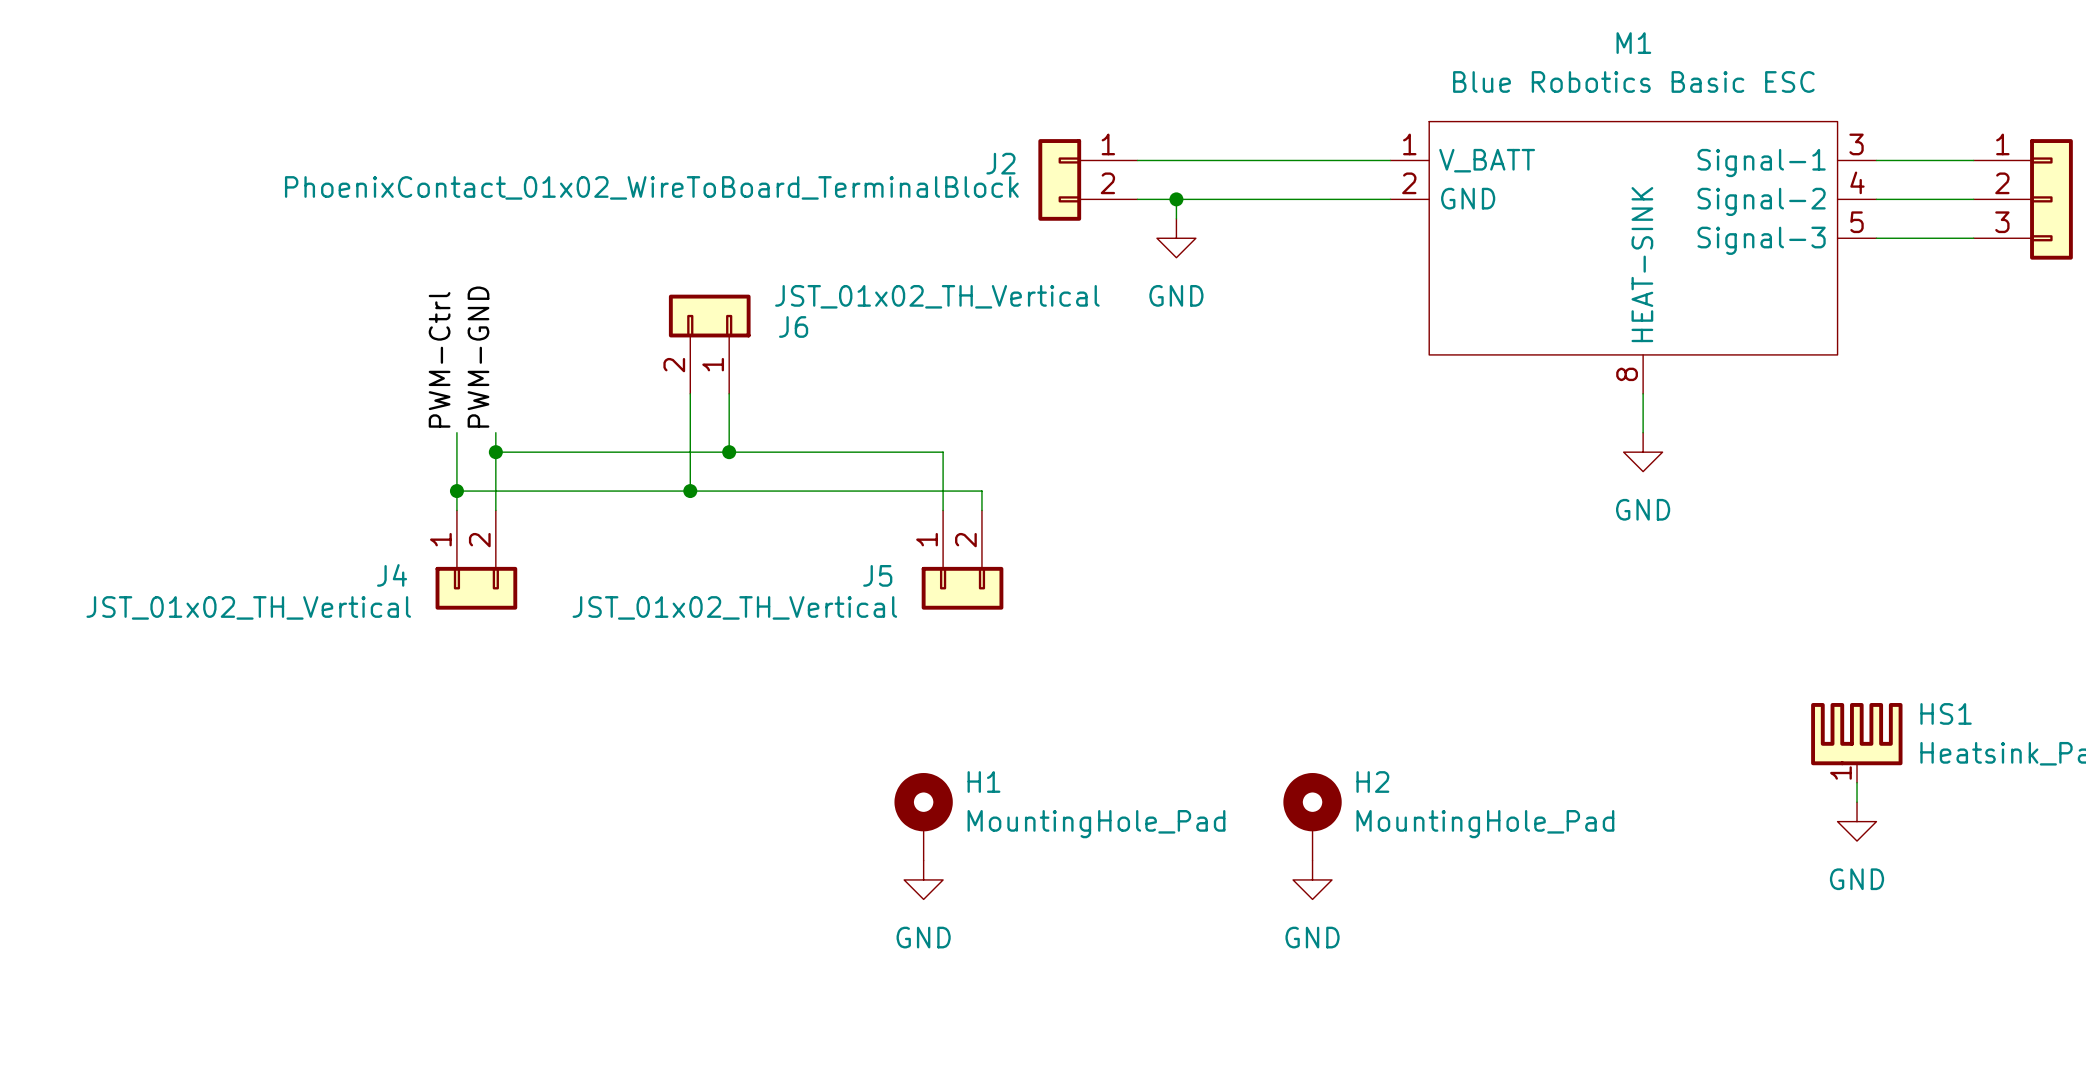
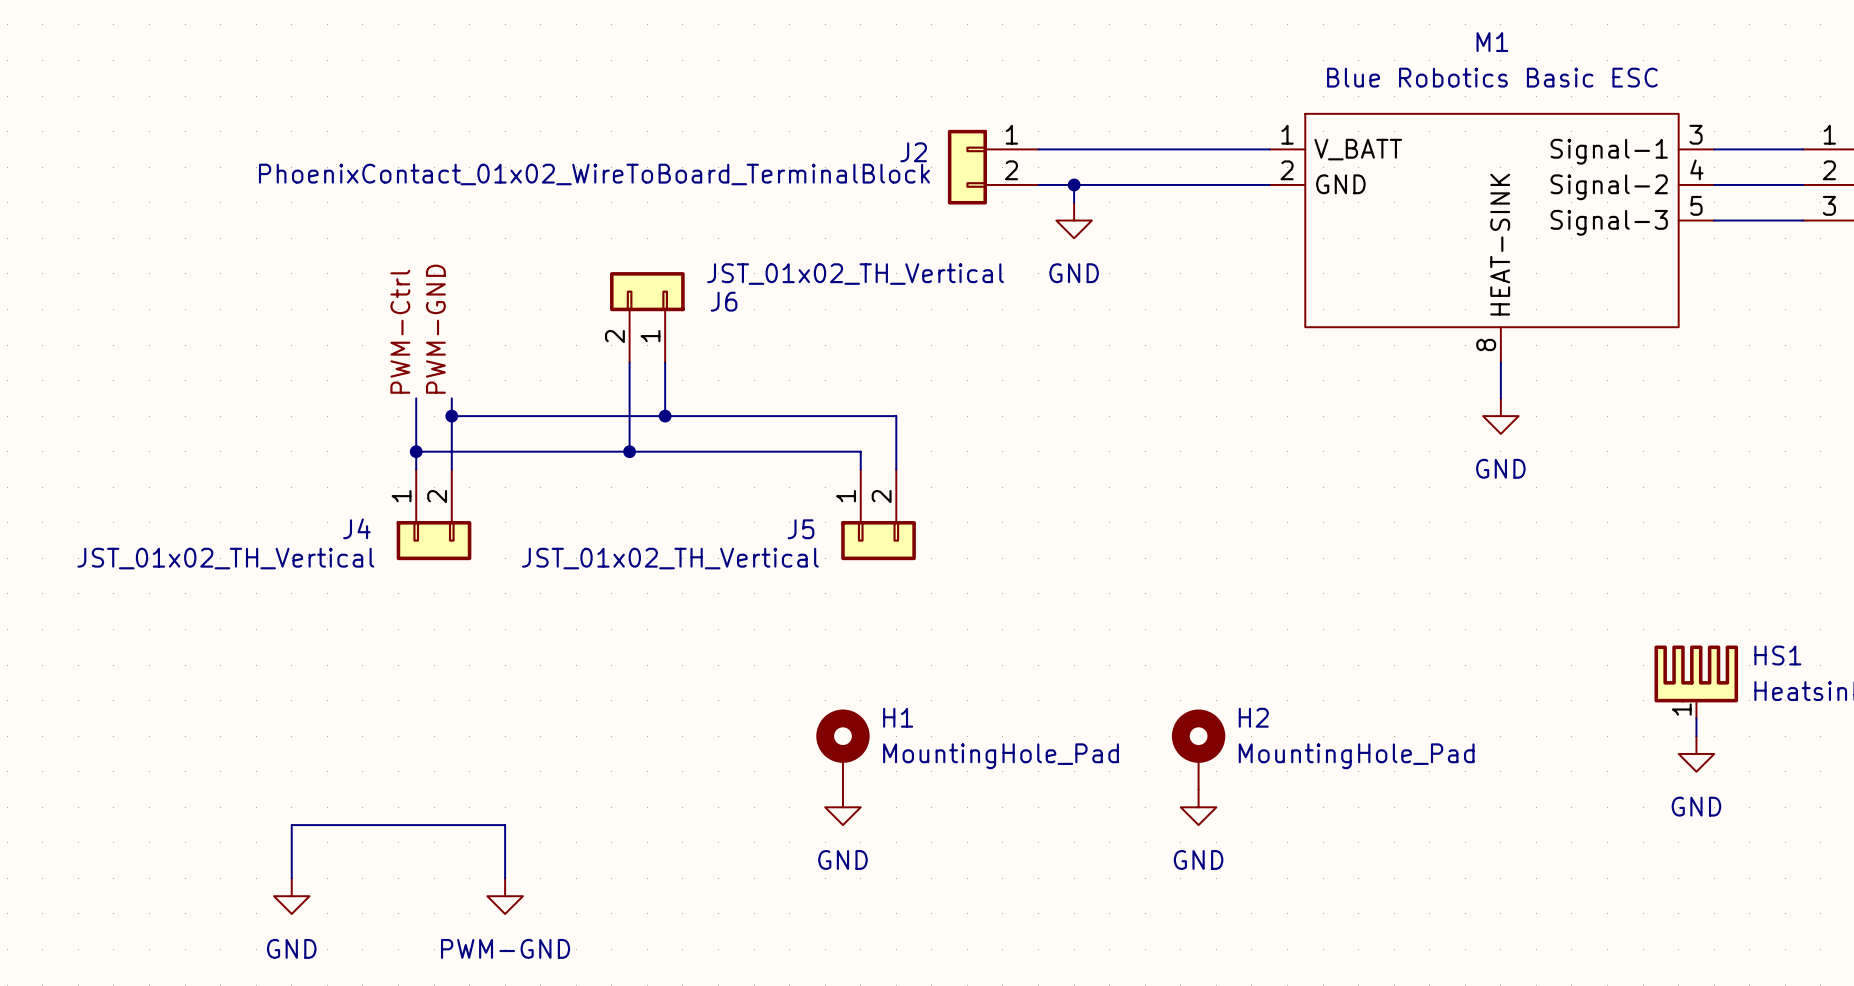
wire: (943, 452) (943, 491) (981, 491) -> (860, 416) (896, 416) (896, 451)
wire: none -> (291, 878) (291, 825) (505, 825) (505, 878)
power symbol: none -> GND (291, 896)
power symbol: none -> PWM-GND (505, 896)

